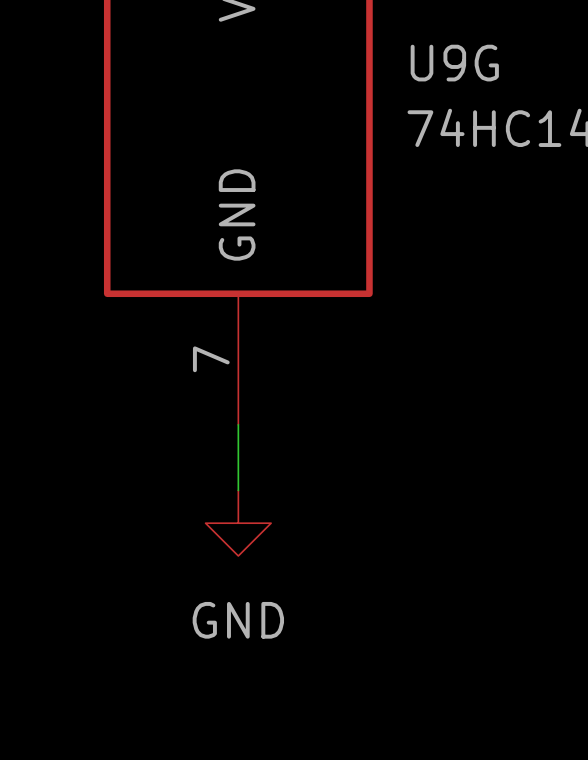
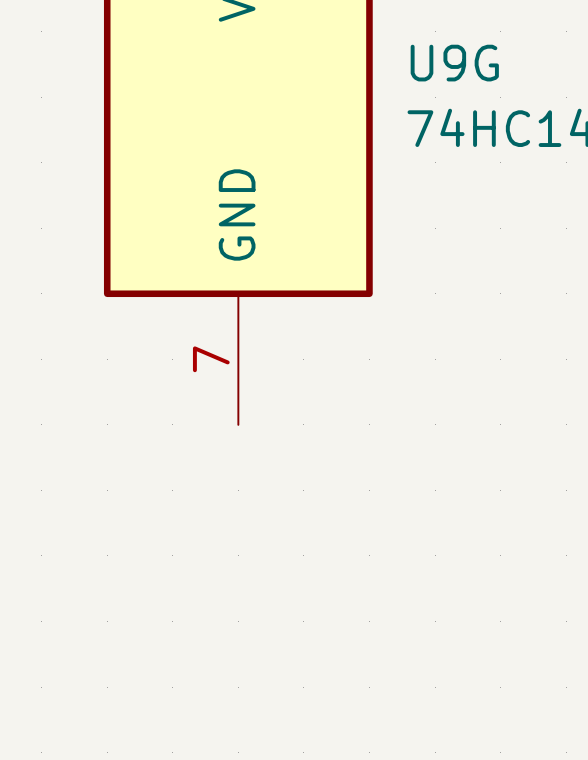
wire: (238, 424) (238, 490) -> none
power symbol: GND (238, 523) -> none

